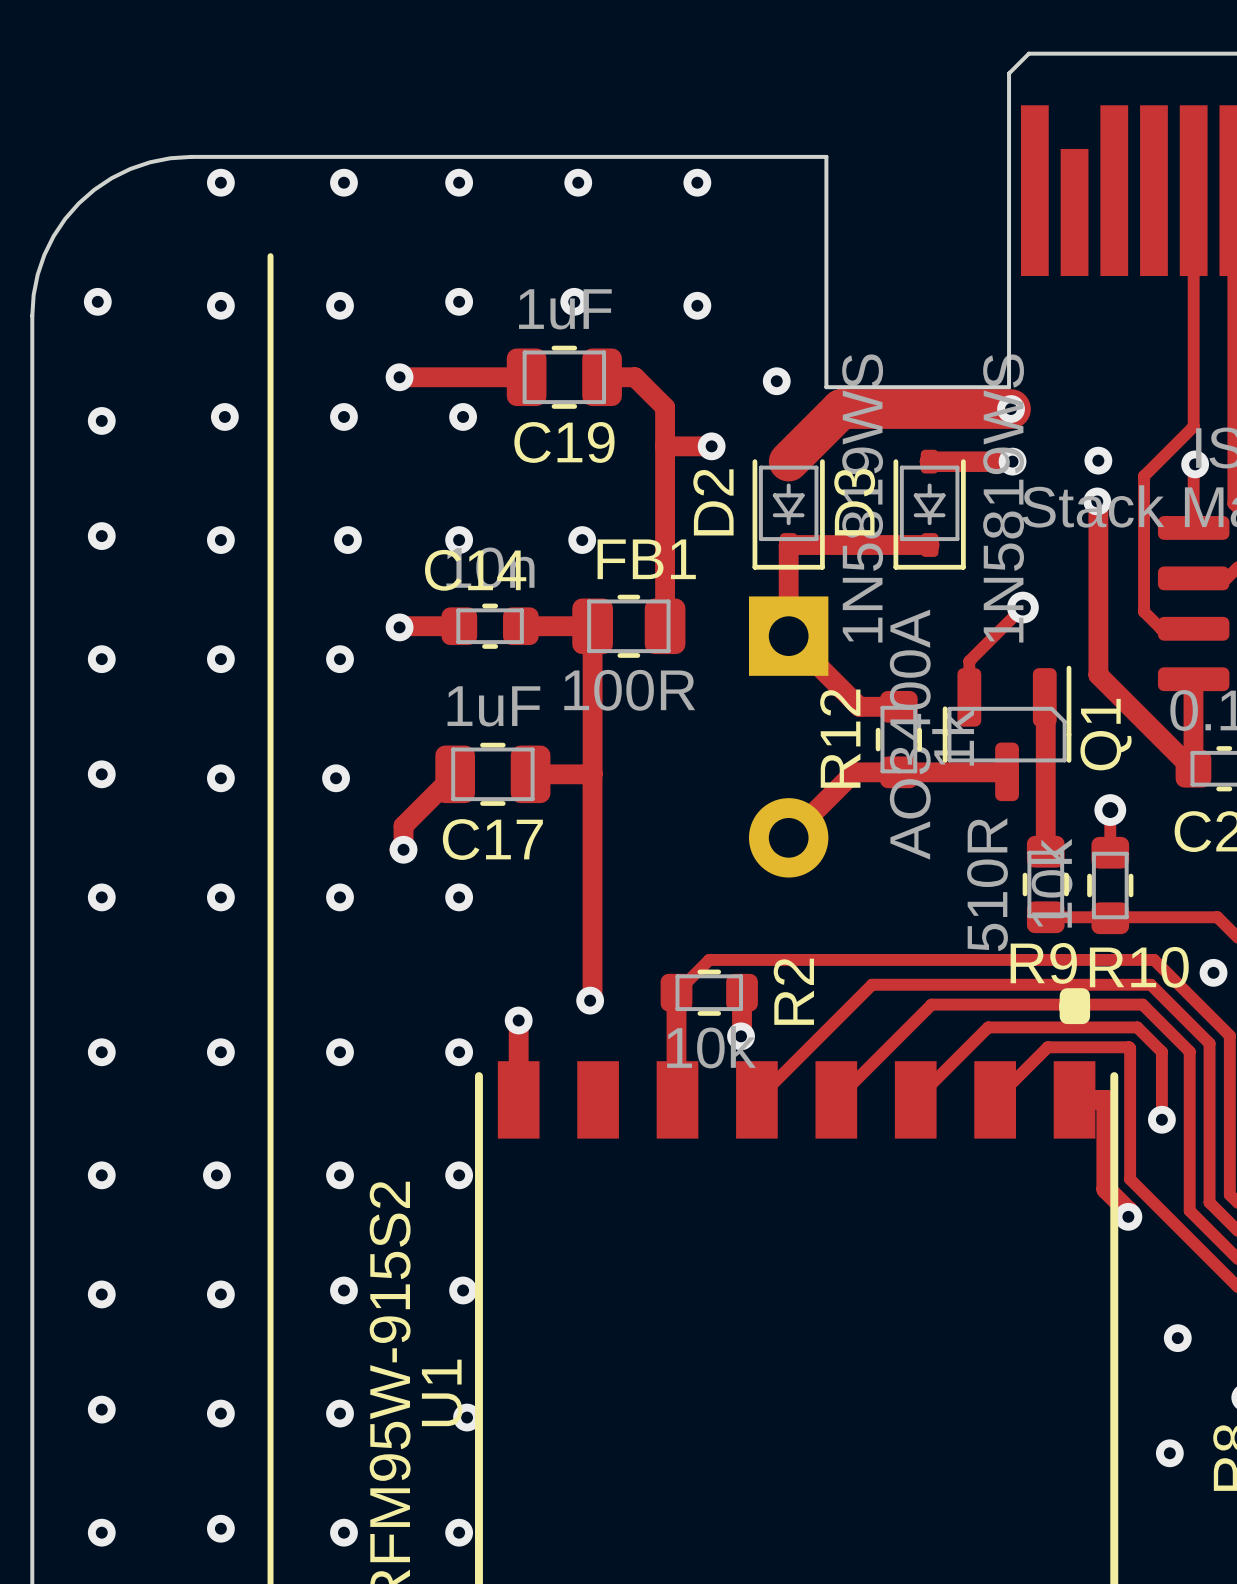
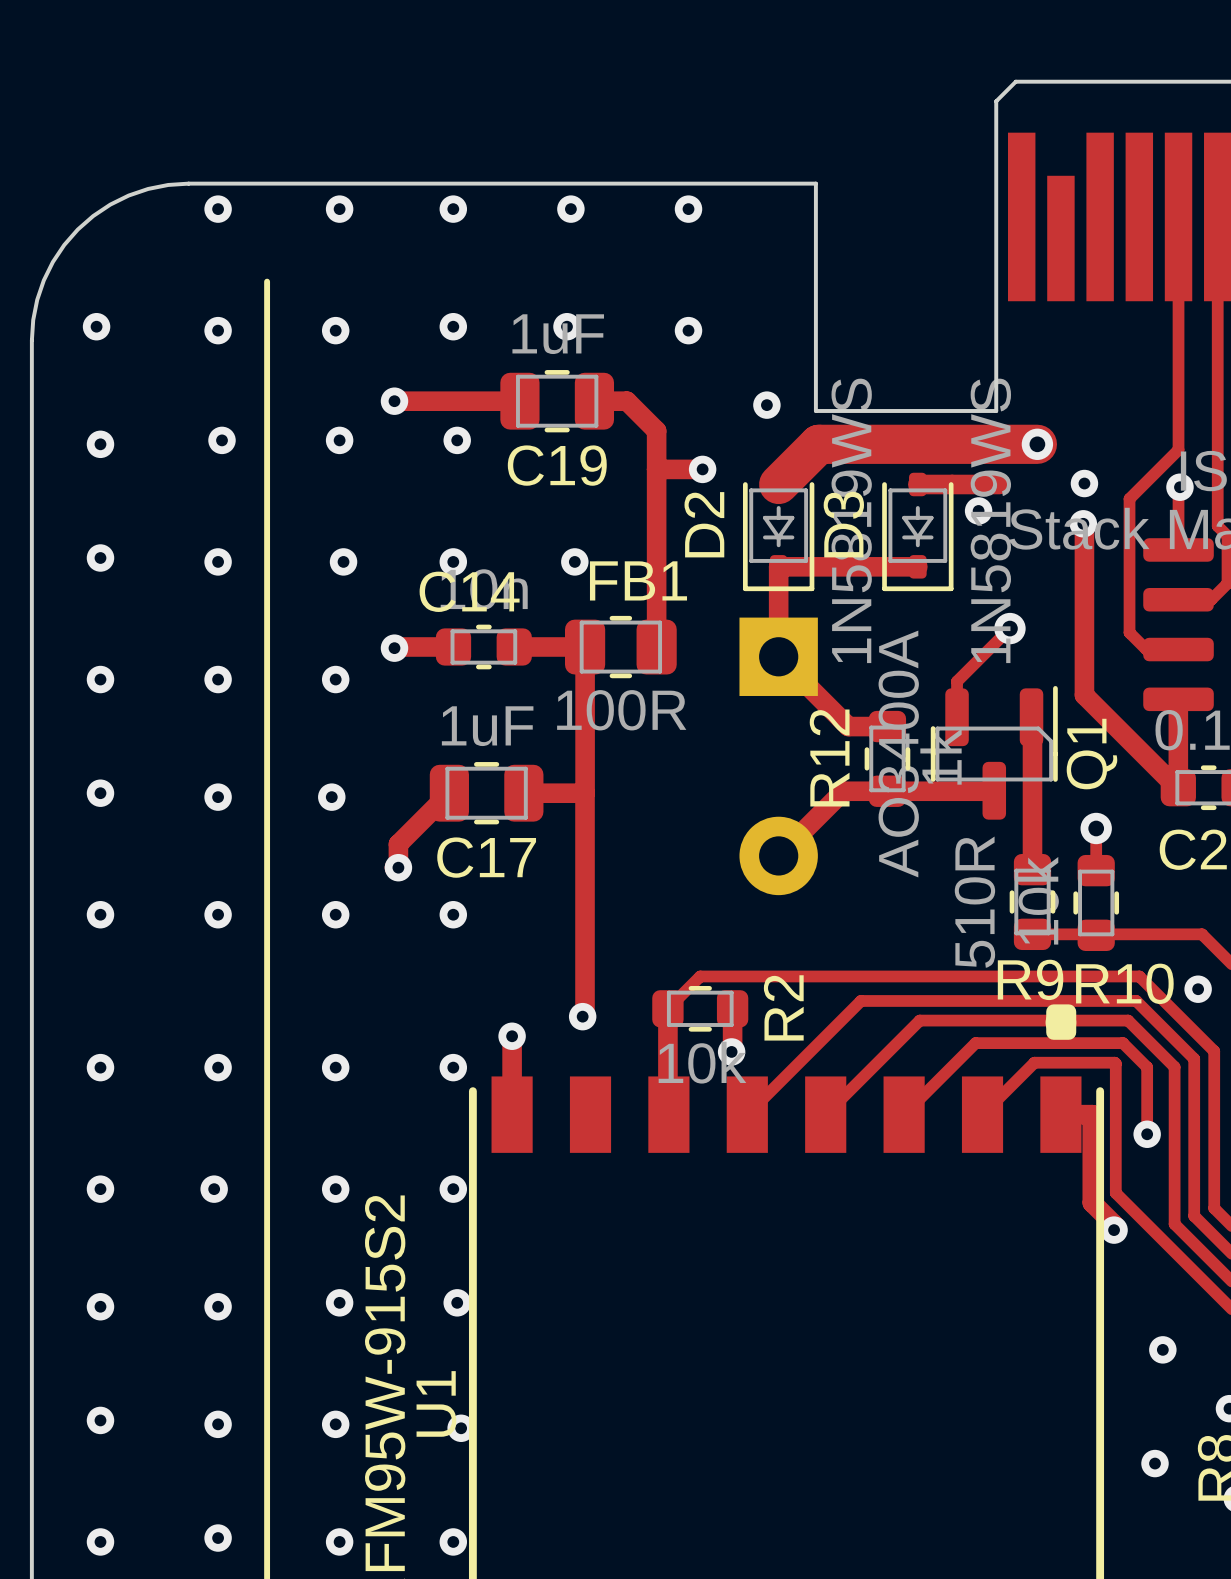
track: (1011, 409) (841, 409) (829, 420) -> (1037, 444) (818, 444)
via: (1011, 409) -> none
via: none -> (1037, 444)
via position: (1012, 461) -> (978, 510)

